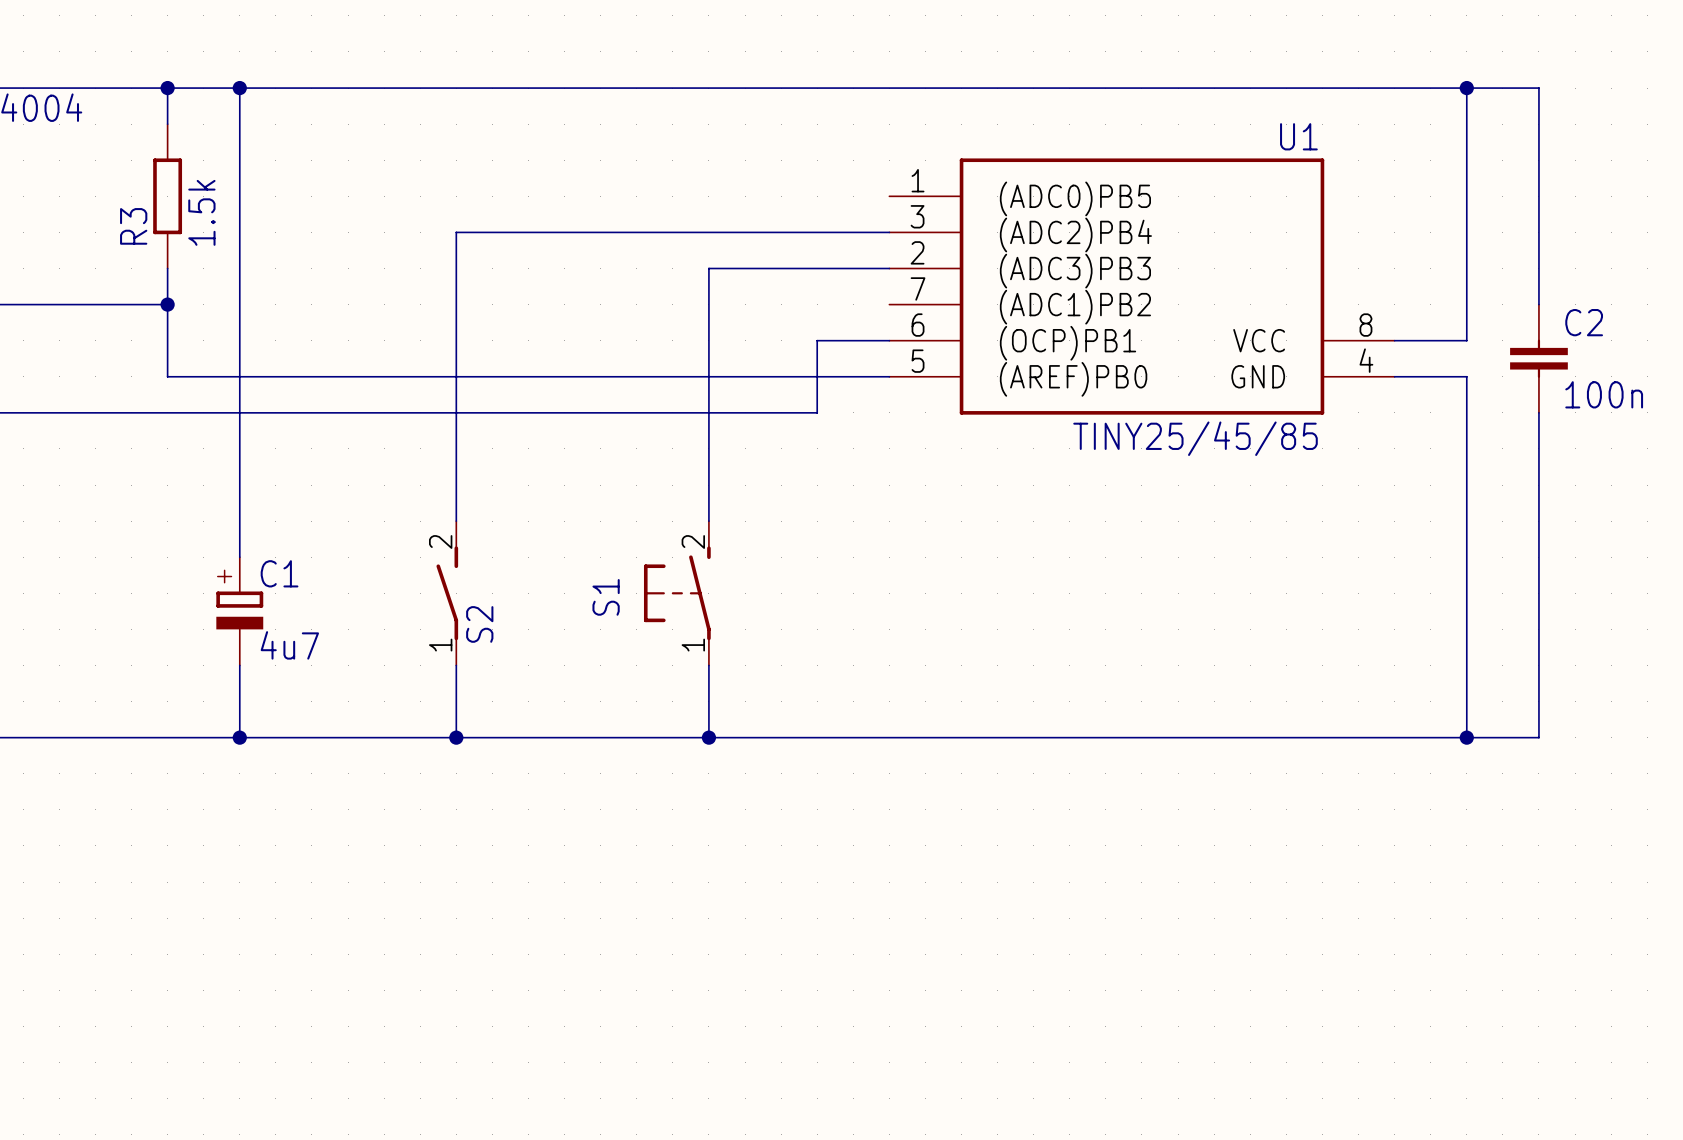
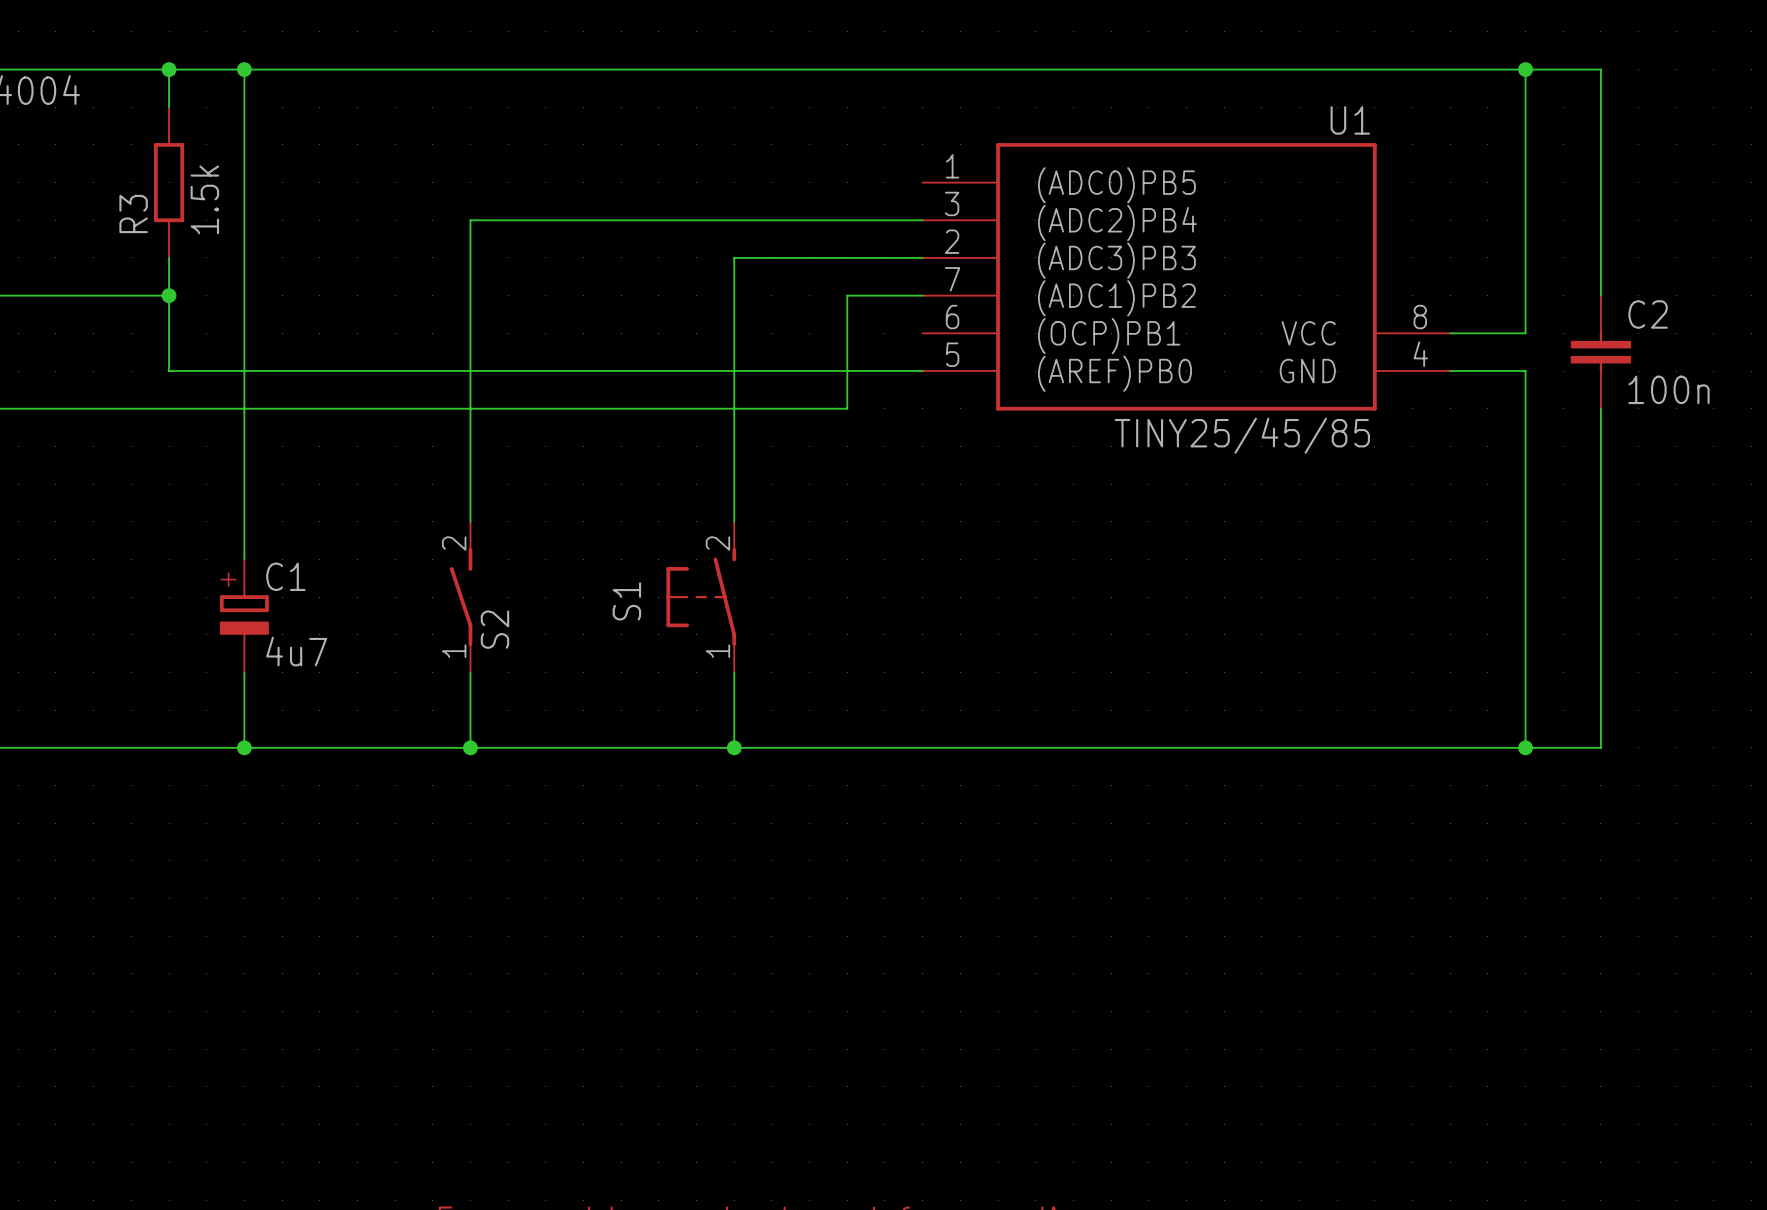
wire: (817, 340) (889, 340) -> (847, 333) (847, 295) (922, 295)

